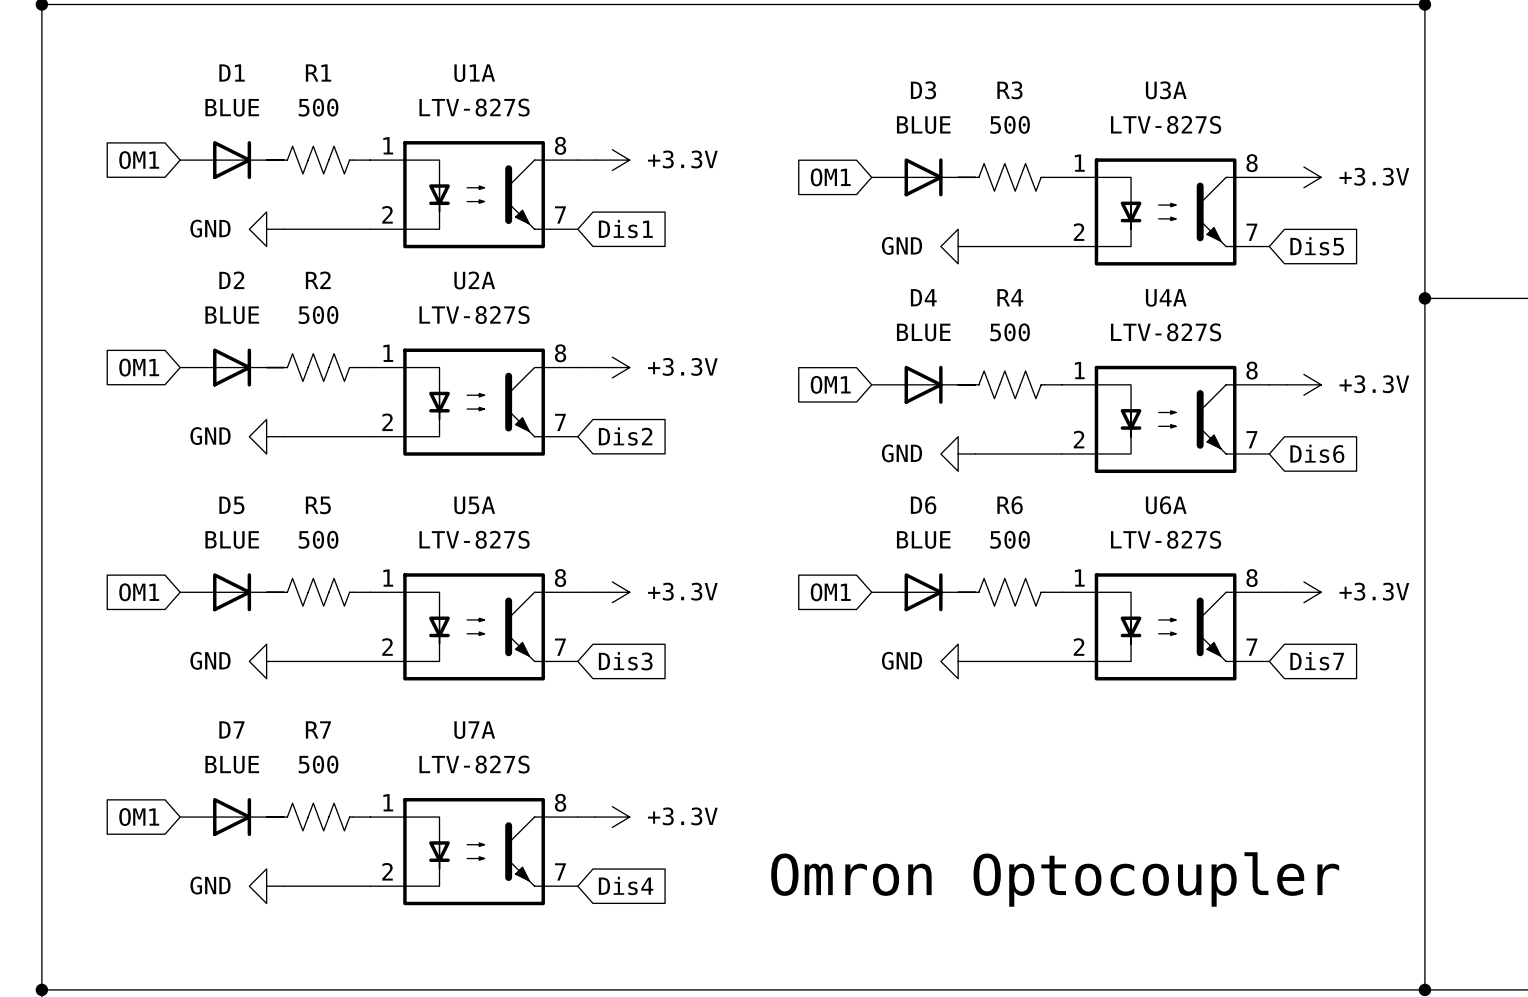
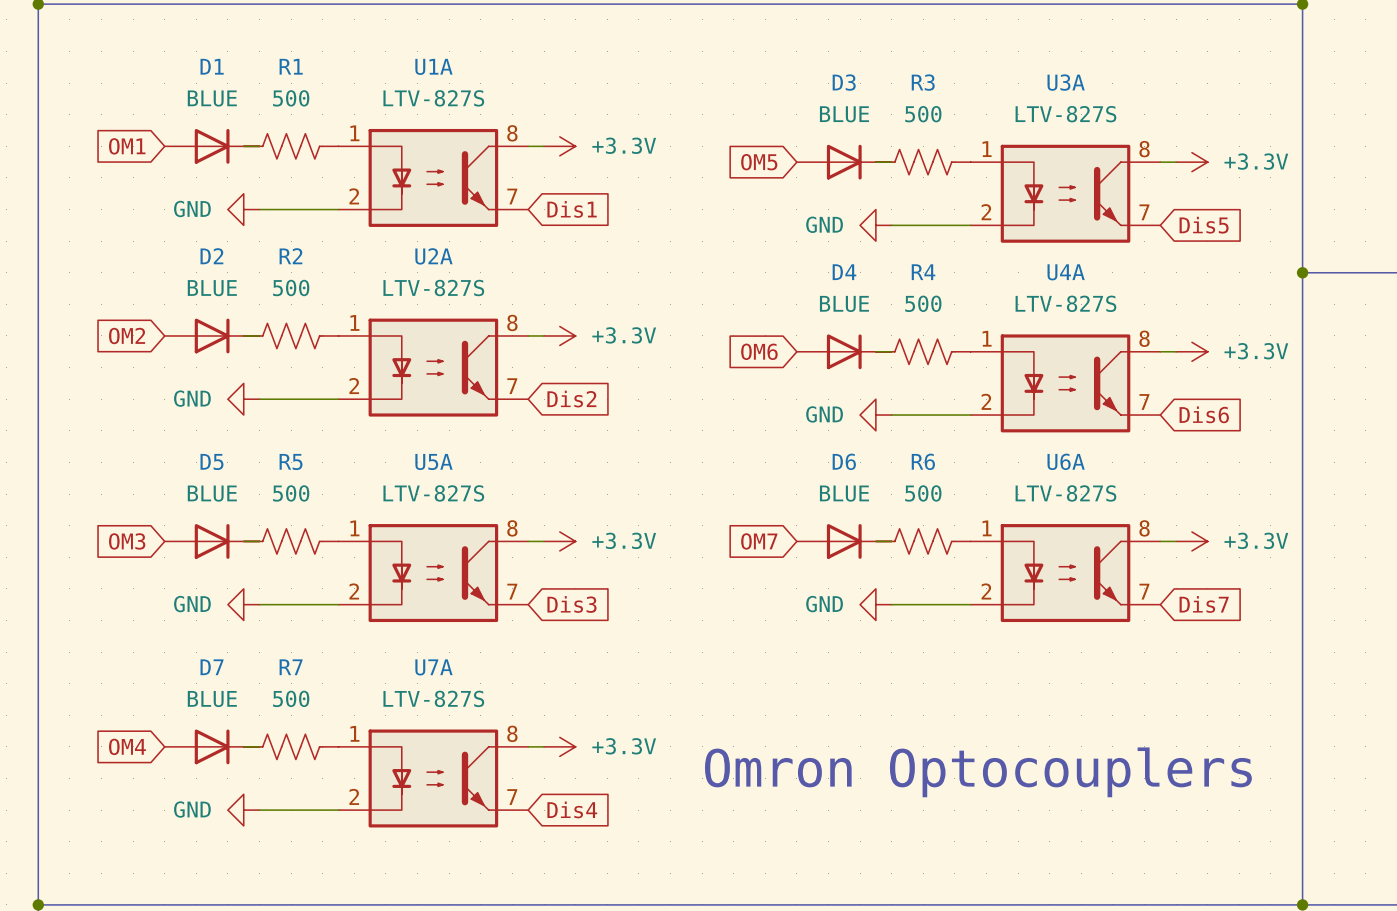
global label: OM1 (830, 177) -> OM5 (759, 162)
global label: OM1 (139, 367) -> OM2 (127, 336)
global label: OM1 (830, 384) -> OM6 (759, 351)
global label: OM1 (139, 592) -> OM3 (127, 541)
global label: OM1 (830, 592) -> OM7 (759, 541)
global label: OM1 (139, 817) -> OM4 (127, 746)
text: Omron Optocoupler (1055, 879) -> Omron Optocouplers (978, 772)

